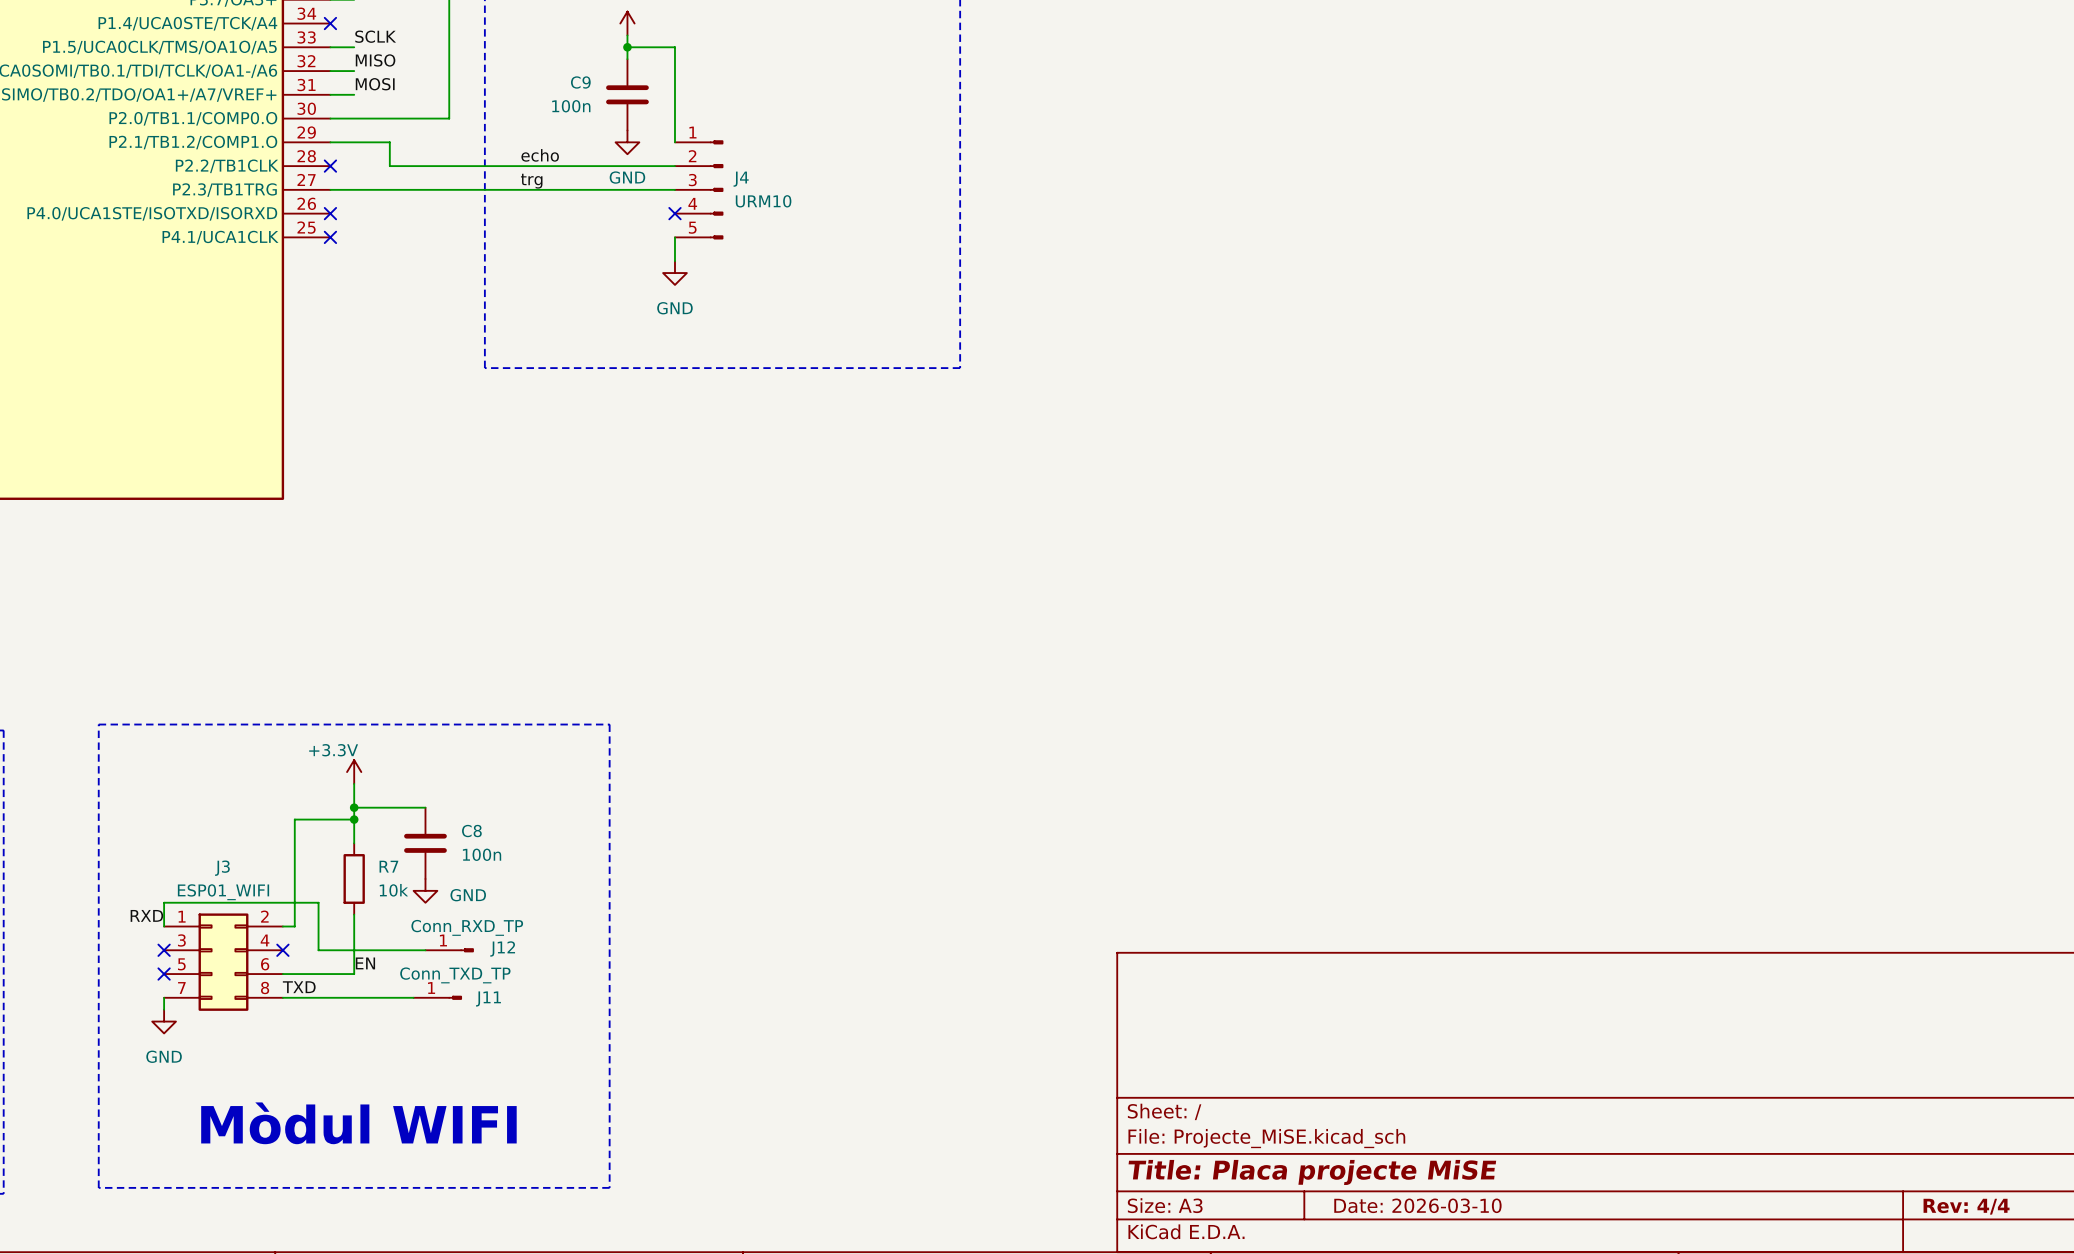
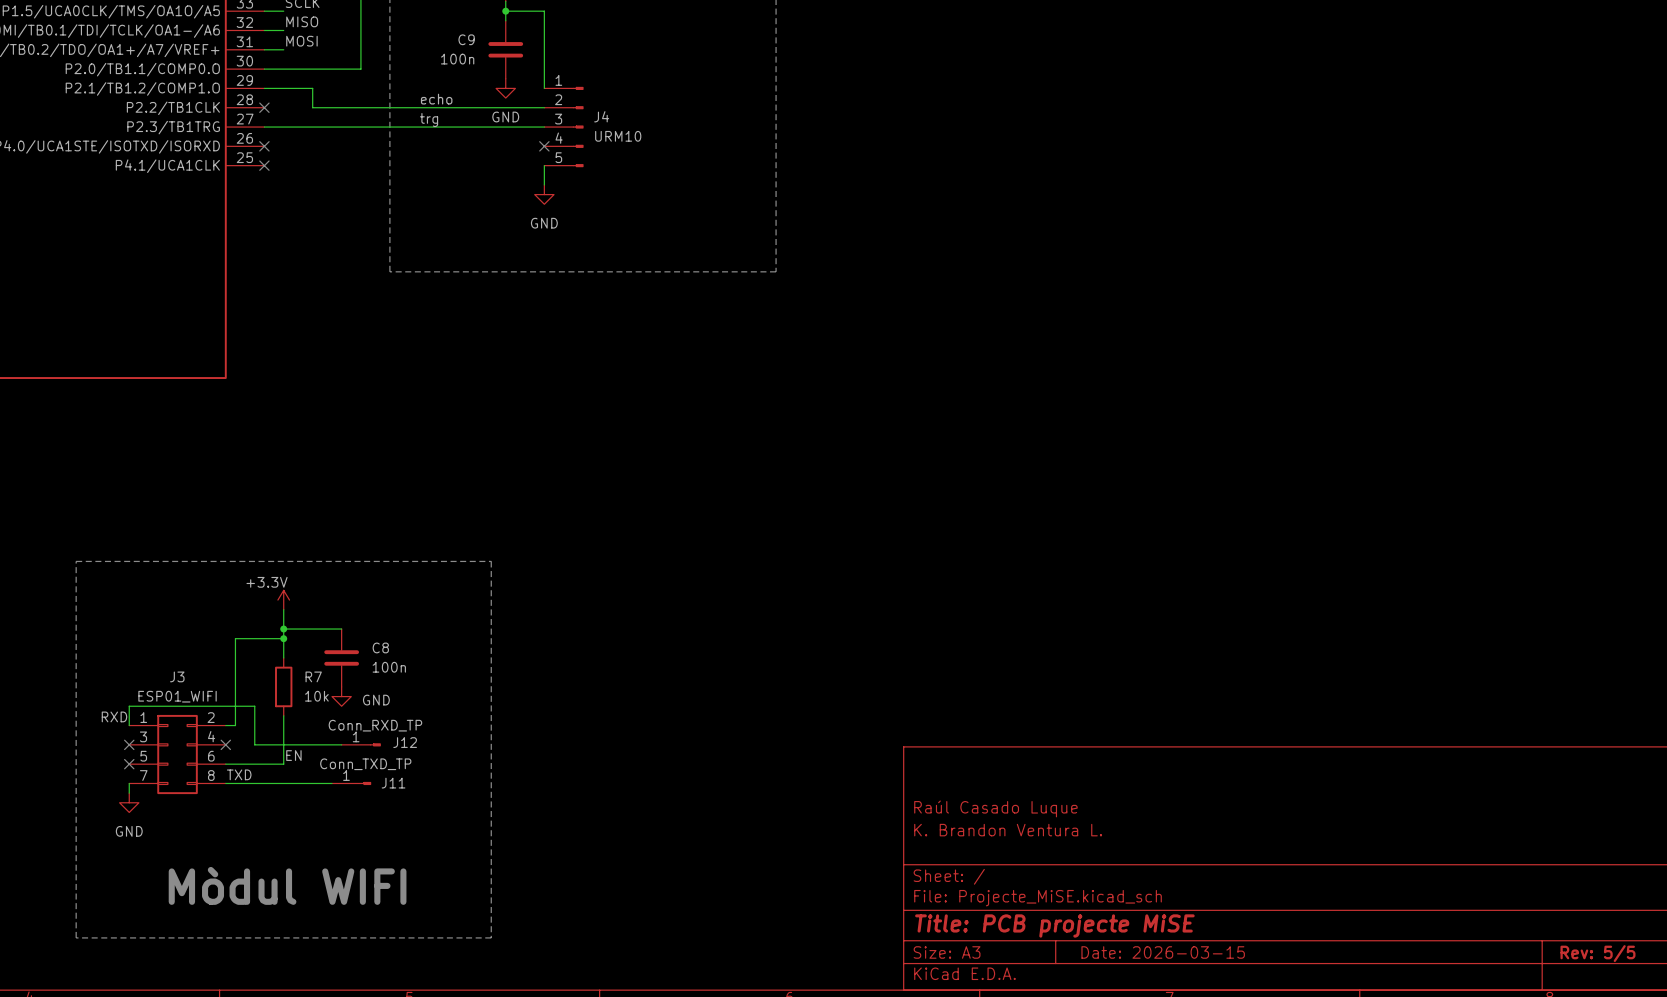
title block: none -> Raúl Casado Luque (995, 808)
title block: none -> K. Brandon Ventura L. (1008, 830)
title block: Title: Placa projecte MiSE (1312, 1172) -> Title: PCB projecte MiSE (1054, 925)
title block: Date: 2026-03-10 (1417, 1205) -> Date: 2026-03-15 (1163, 952)
title block: Rev: 4/4 (1966, 1206) -> Rev: 5/5 (1597, 953)

